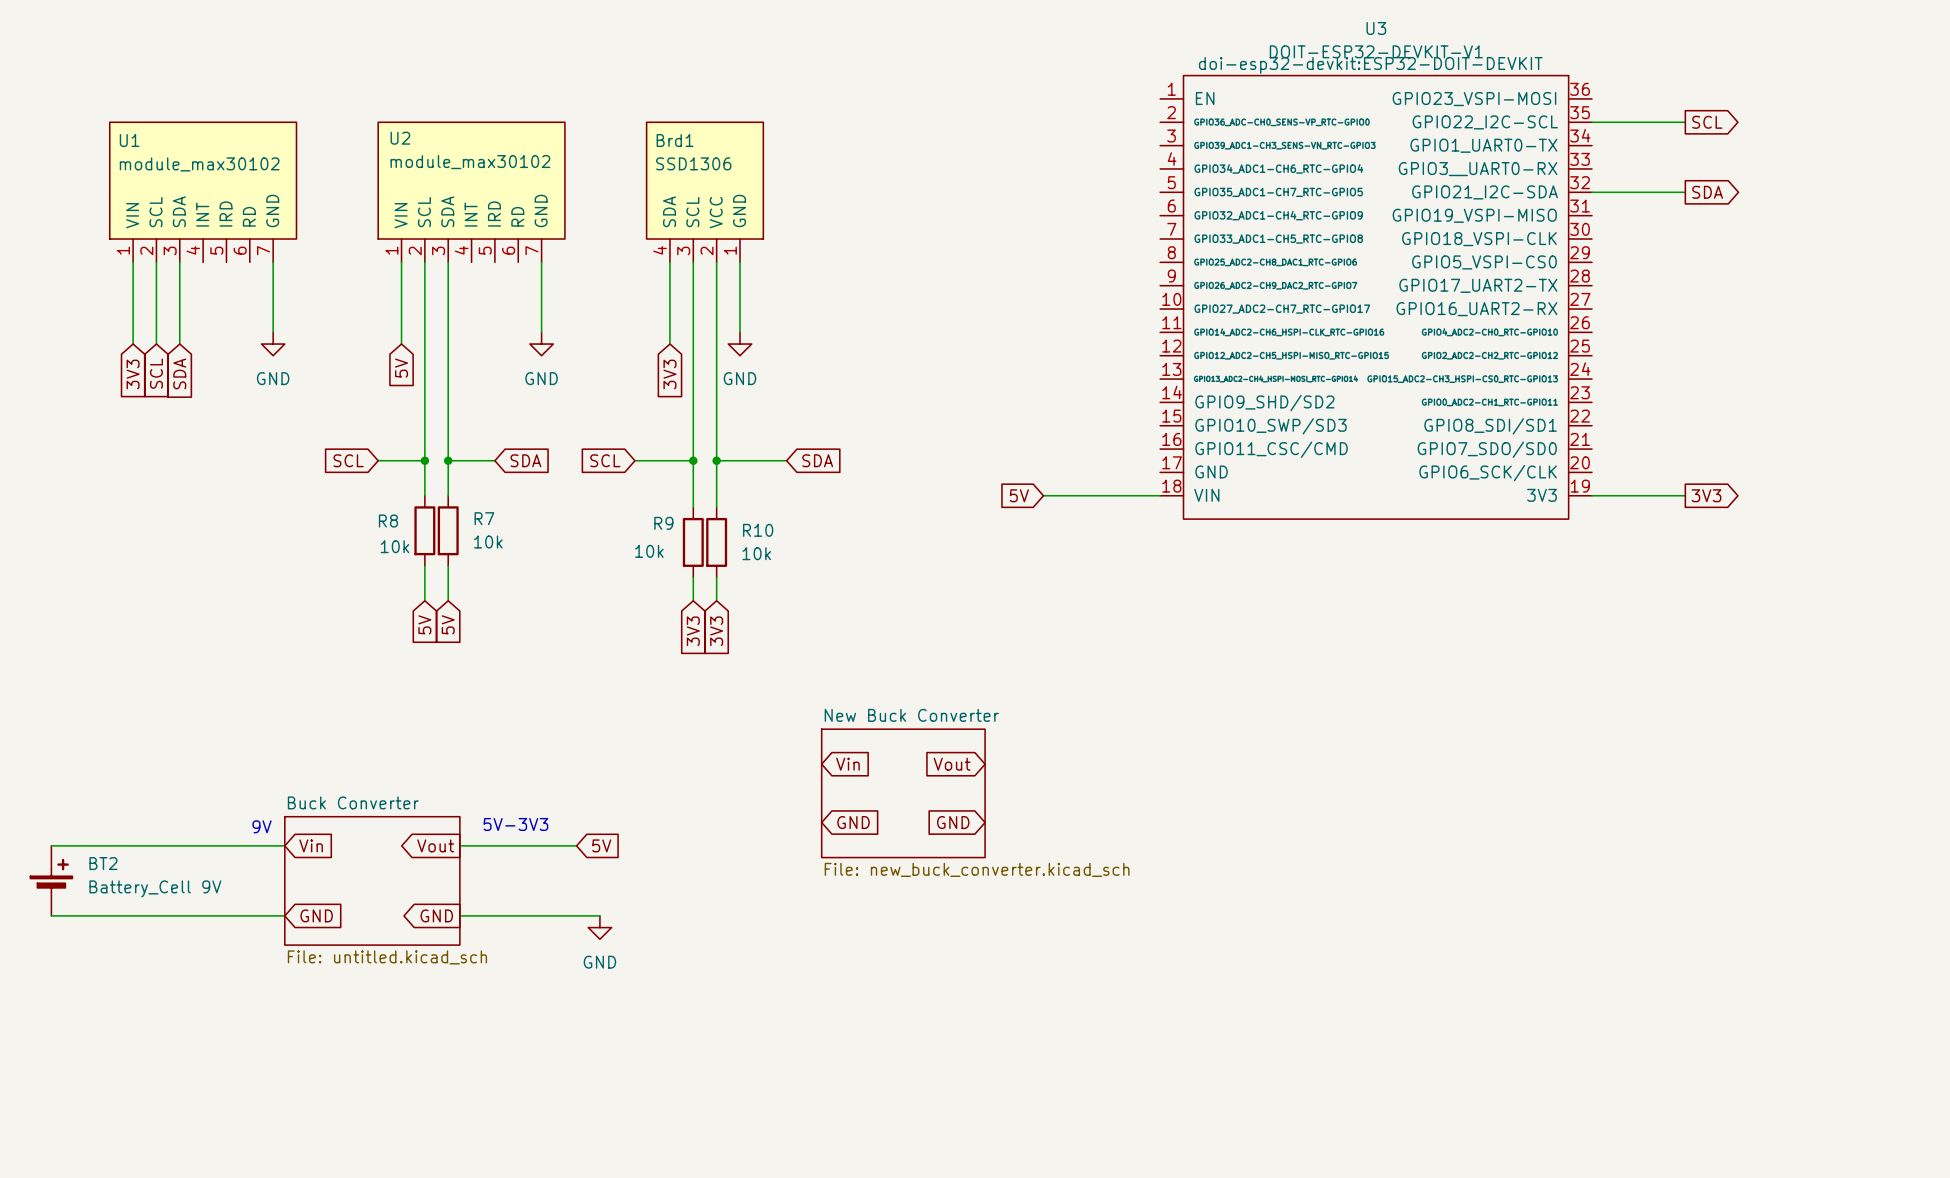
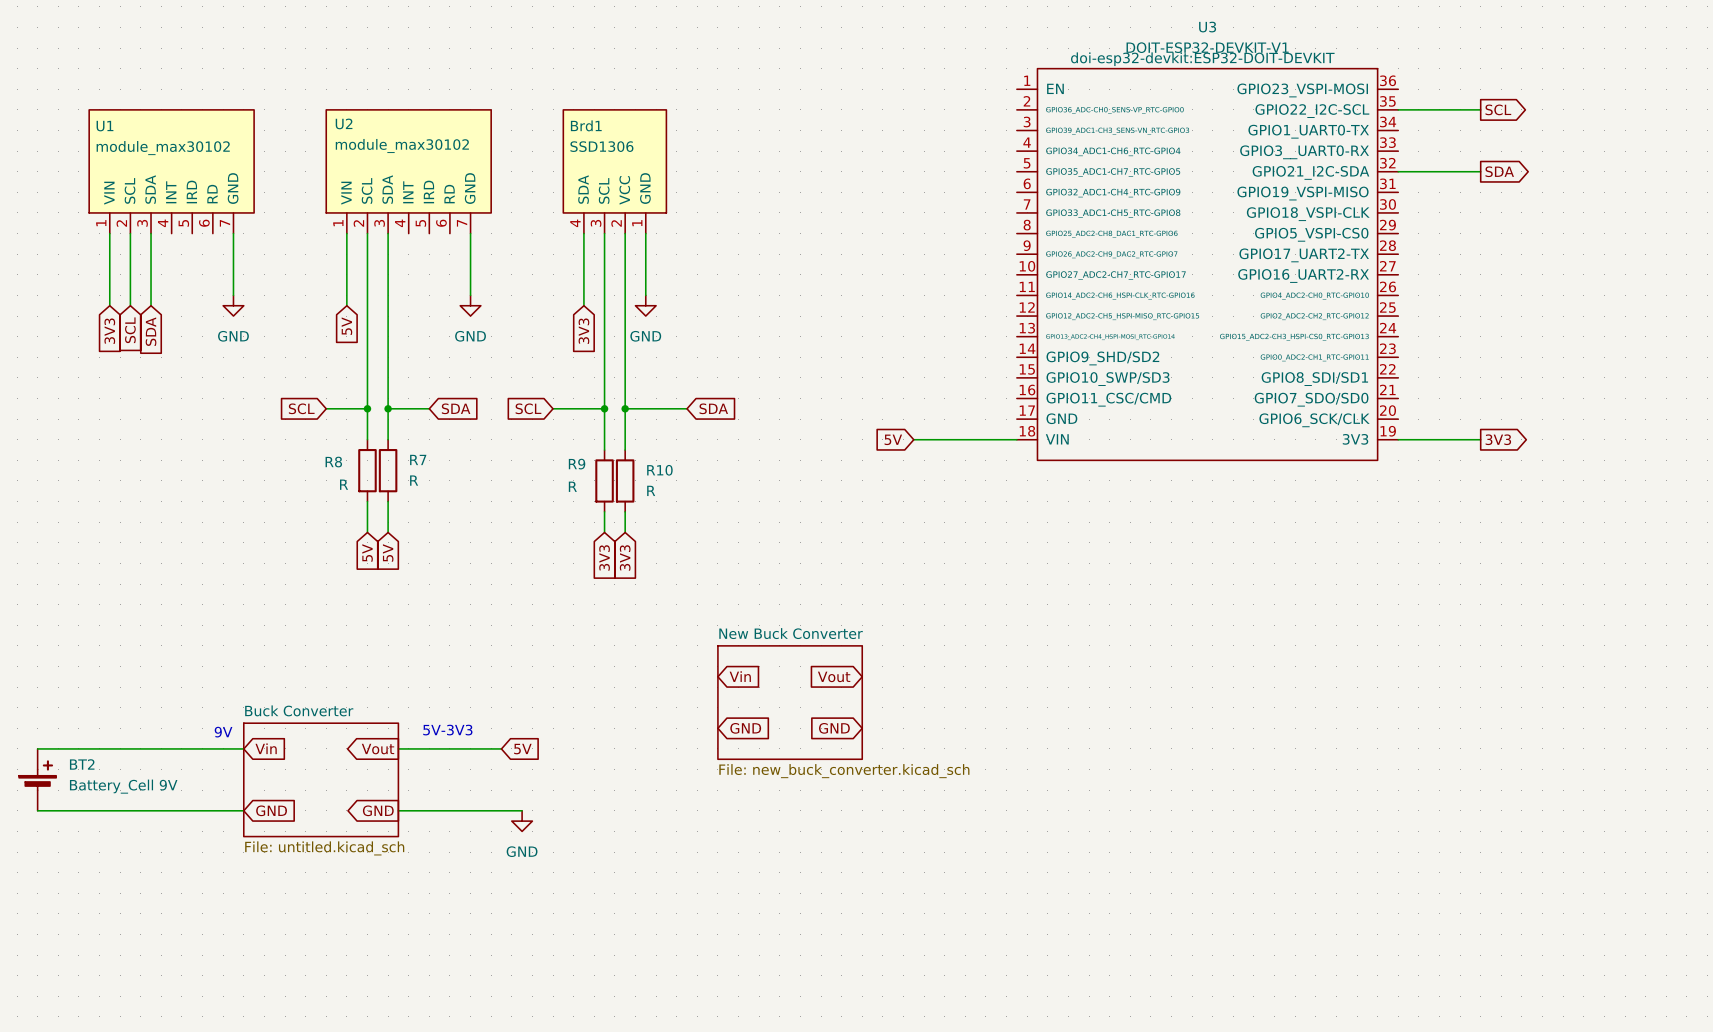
R7 value: 10k (488, 542) -> R (414, 480)
R8 value: 10k (394, 546) -> R (344, 484)
R9 value: 10k (649, 551) -> R (572, 486)
R10 value: 10k (756, 553) -> R (651, 490)

